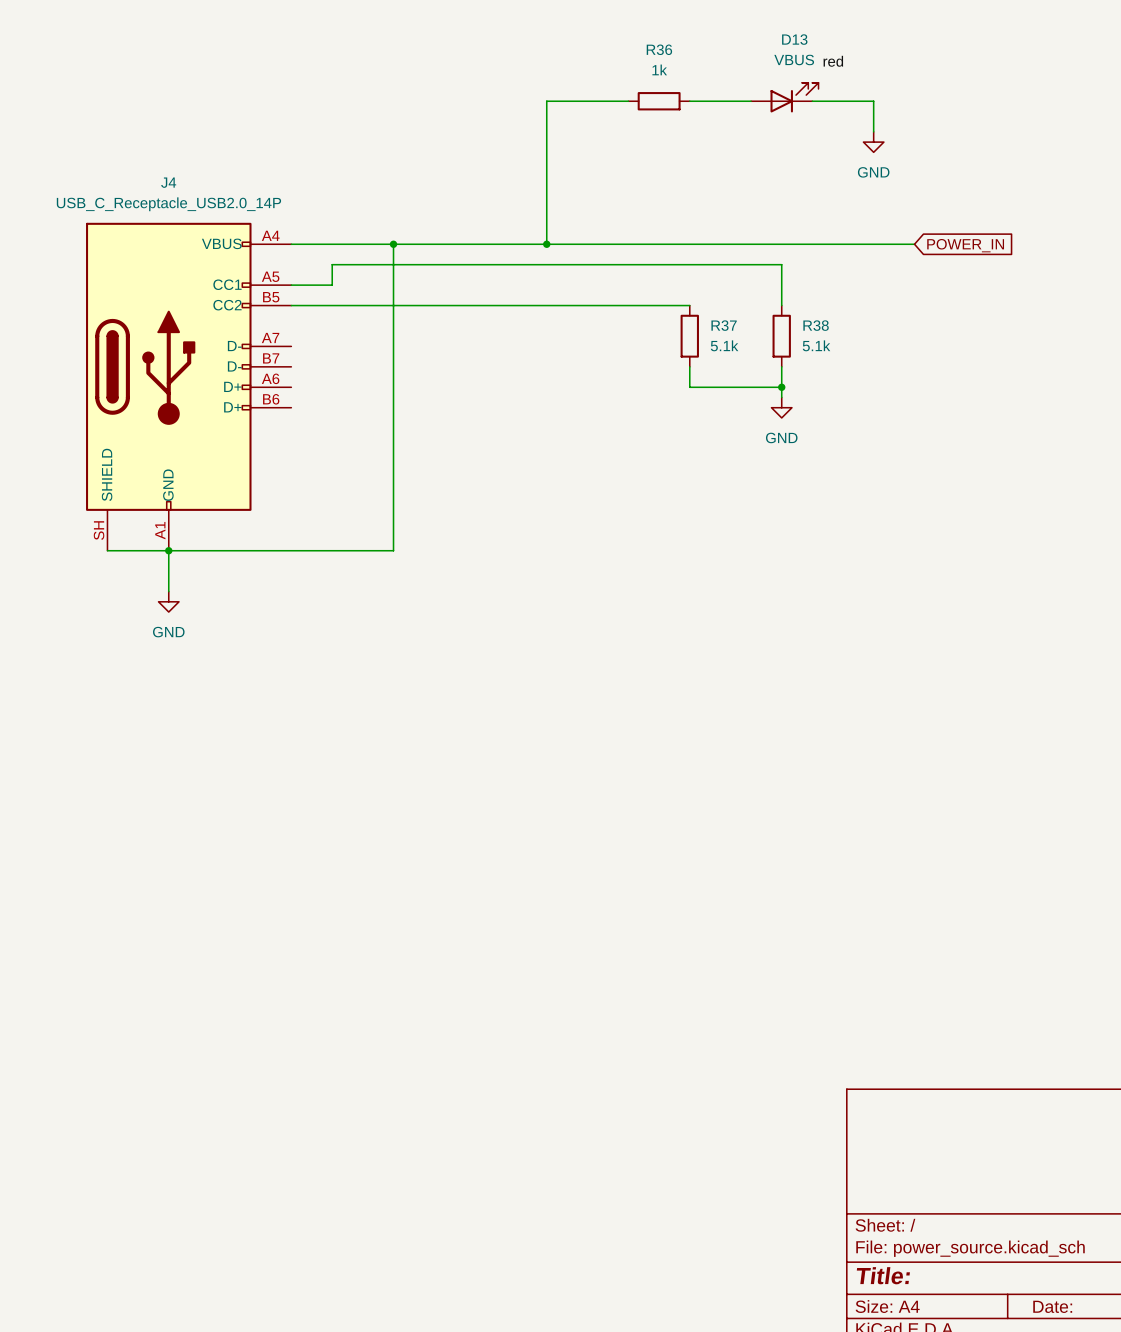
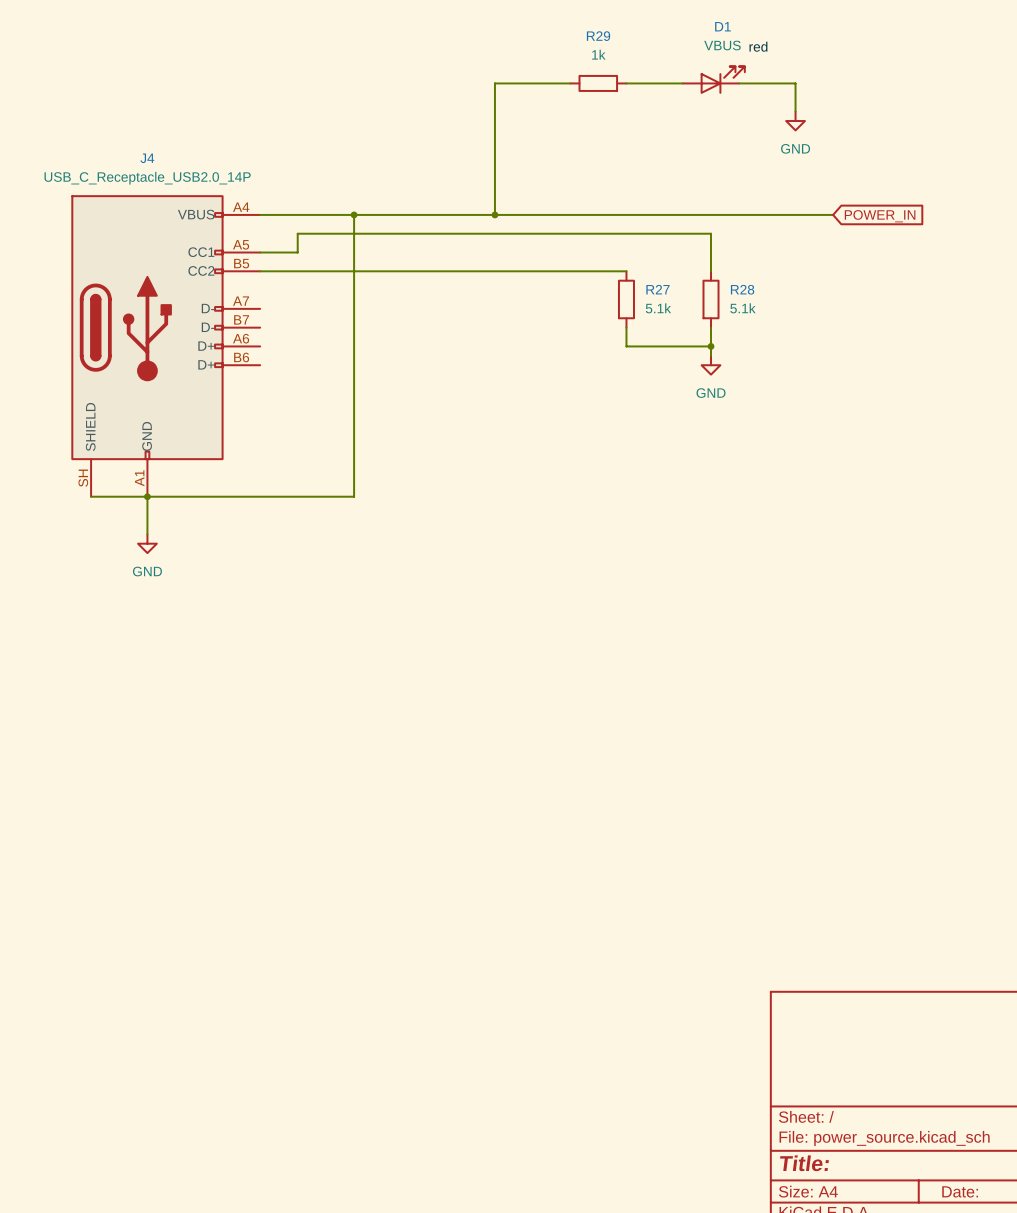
D13 name: D13 (794, 39) -> D1 (722, 26)
R36 name: R36 (659, 49) -> R29 (598, 36)
R37 name: R37 (724, 325) -> R27 (658, 289)
R38 name: R38 (816, 325) -> R28 (742, 289)

